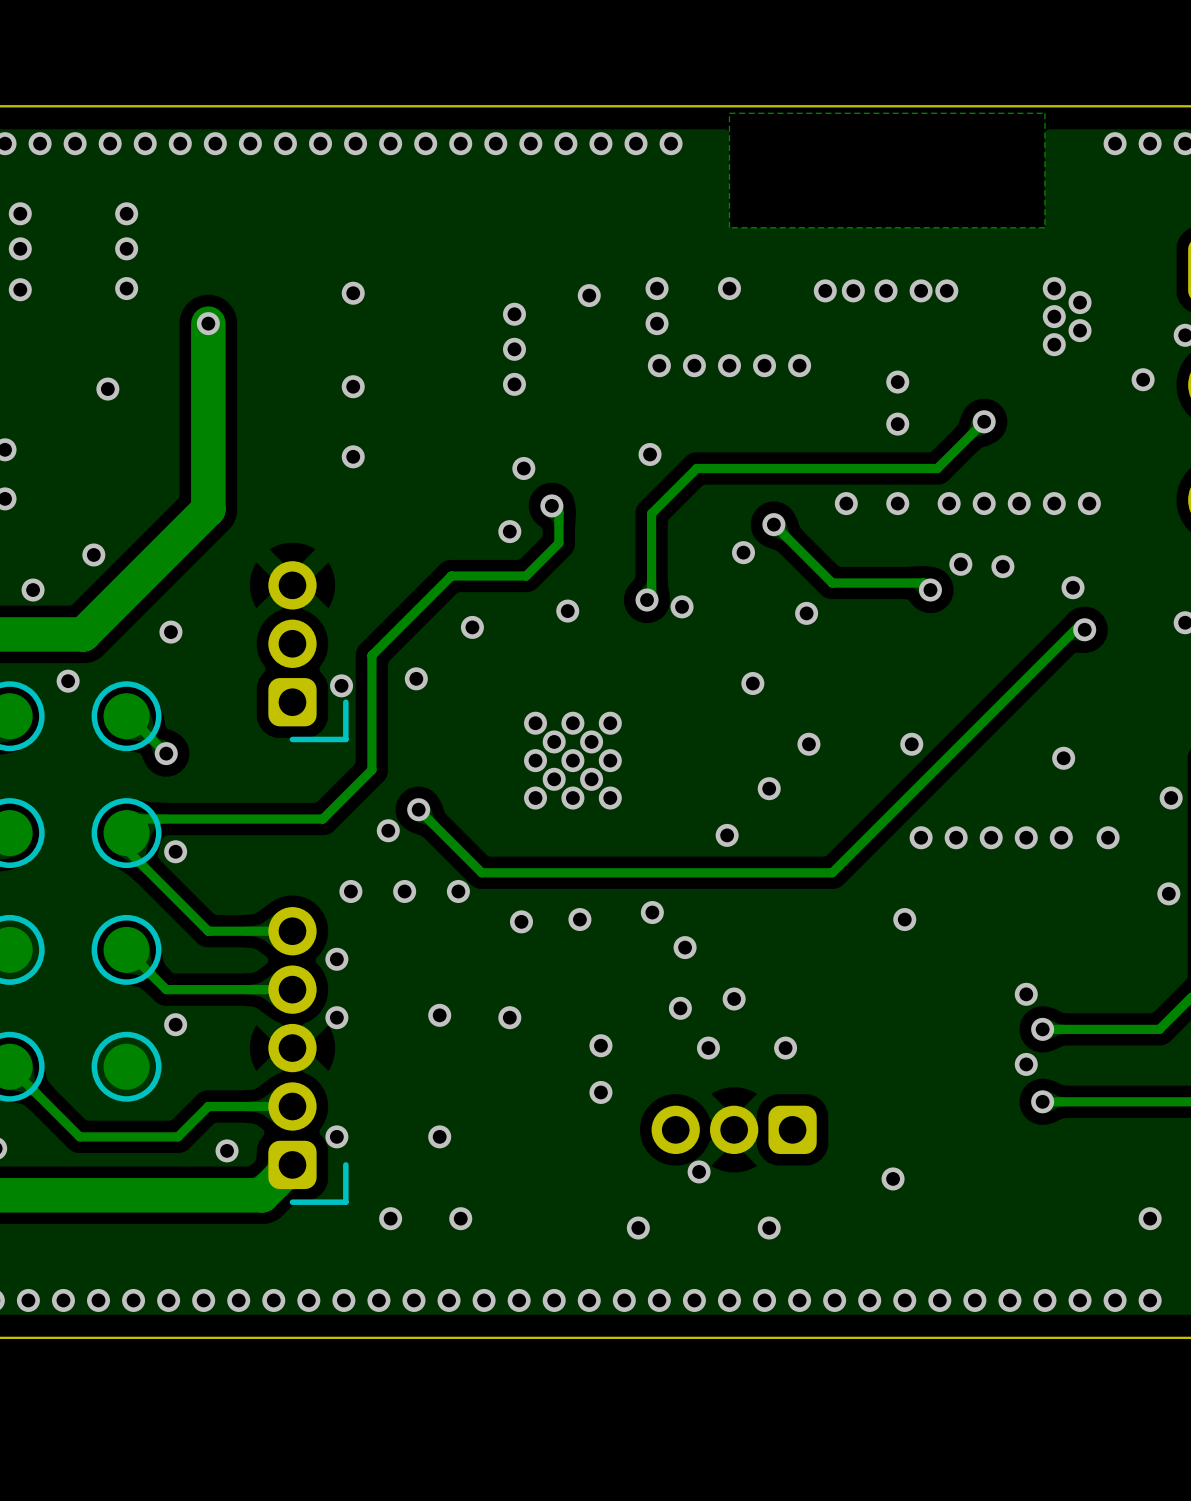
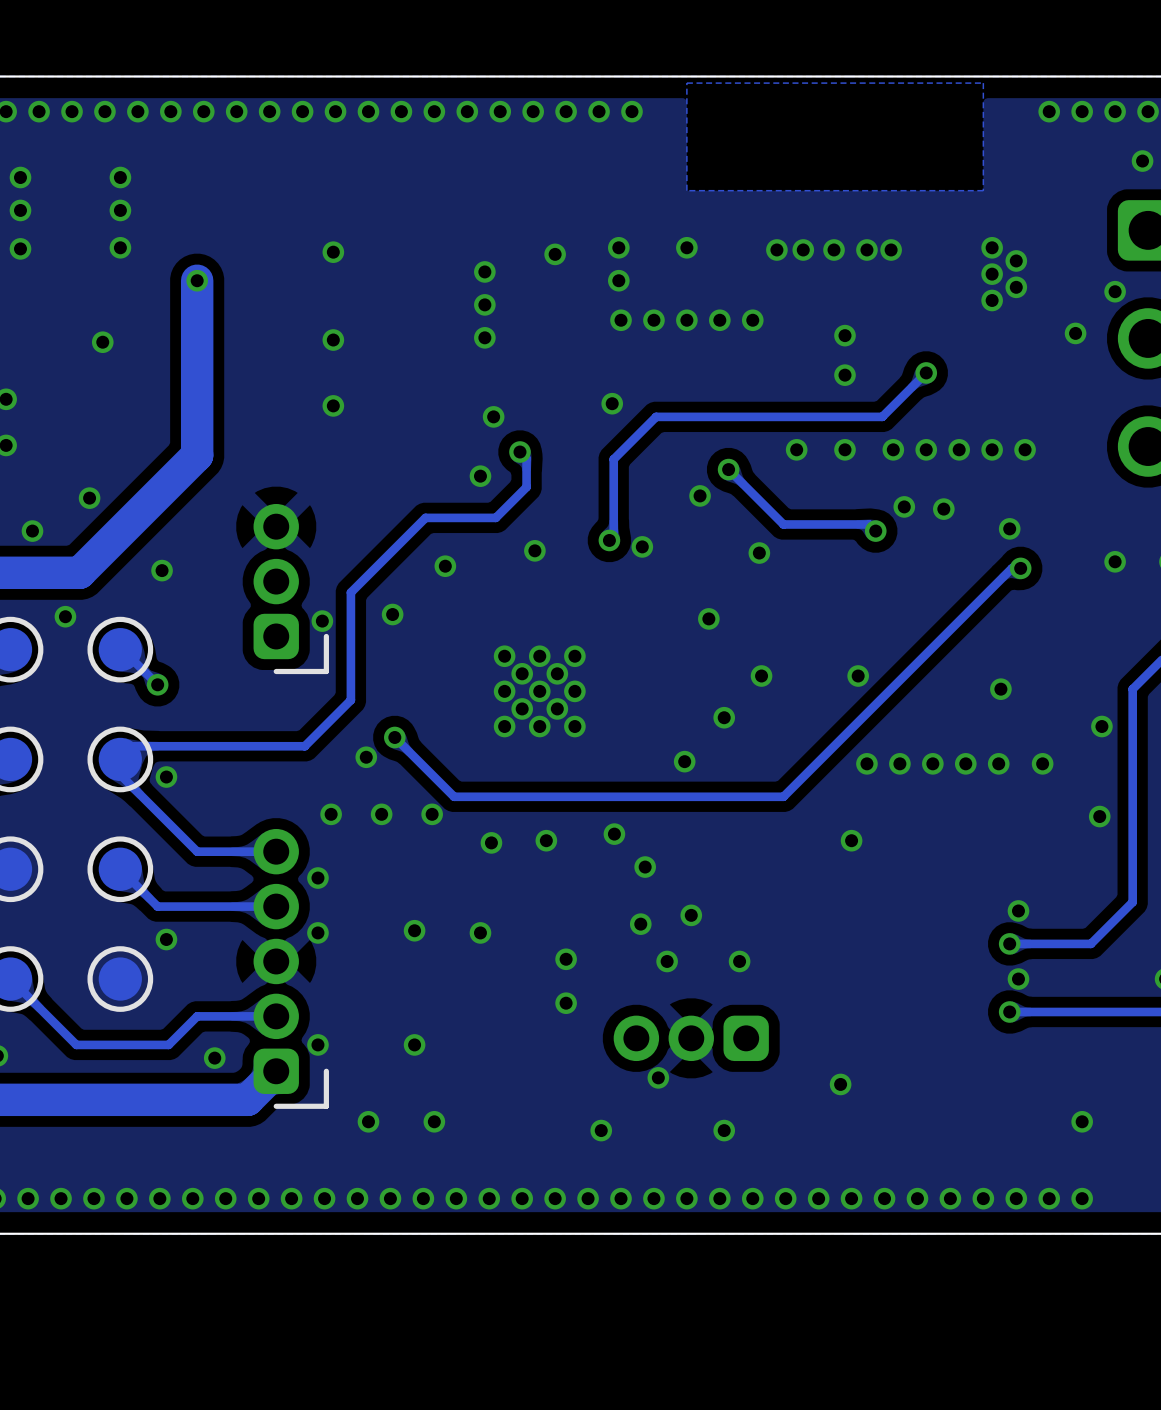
via: (1026, 994) -> none
via: none -> (1018, 910)
via: (1042, 1029) -> none
track: (1073, 1029) (1042, 1029) -> none
via: none -> (1009, 943)
via: (1026, 1064) -> none
via: none -> (1018, 979)
via: (1042, 1101) -> none
track: (1073, 1101) (1042, 1101) -> none
via: none -> (1009, 1011)

